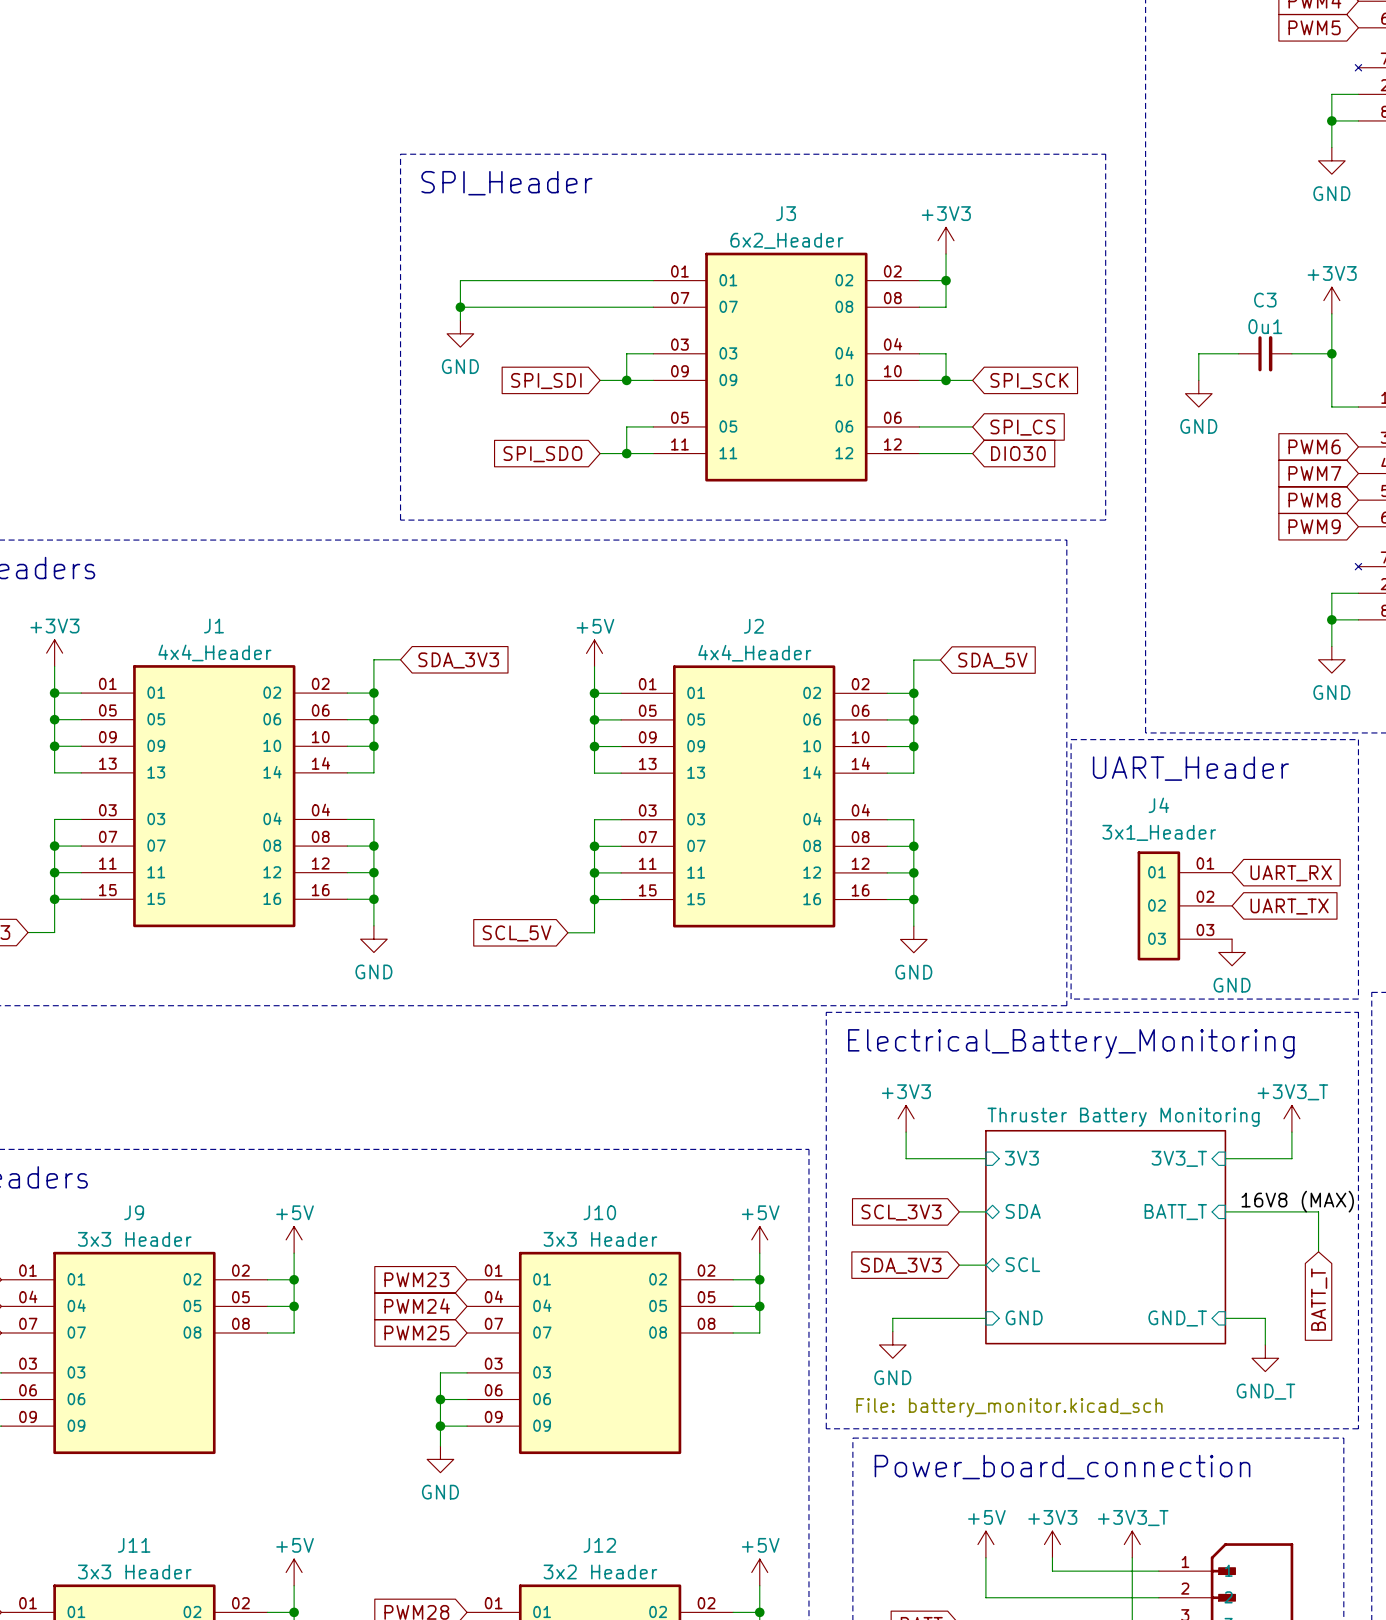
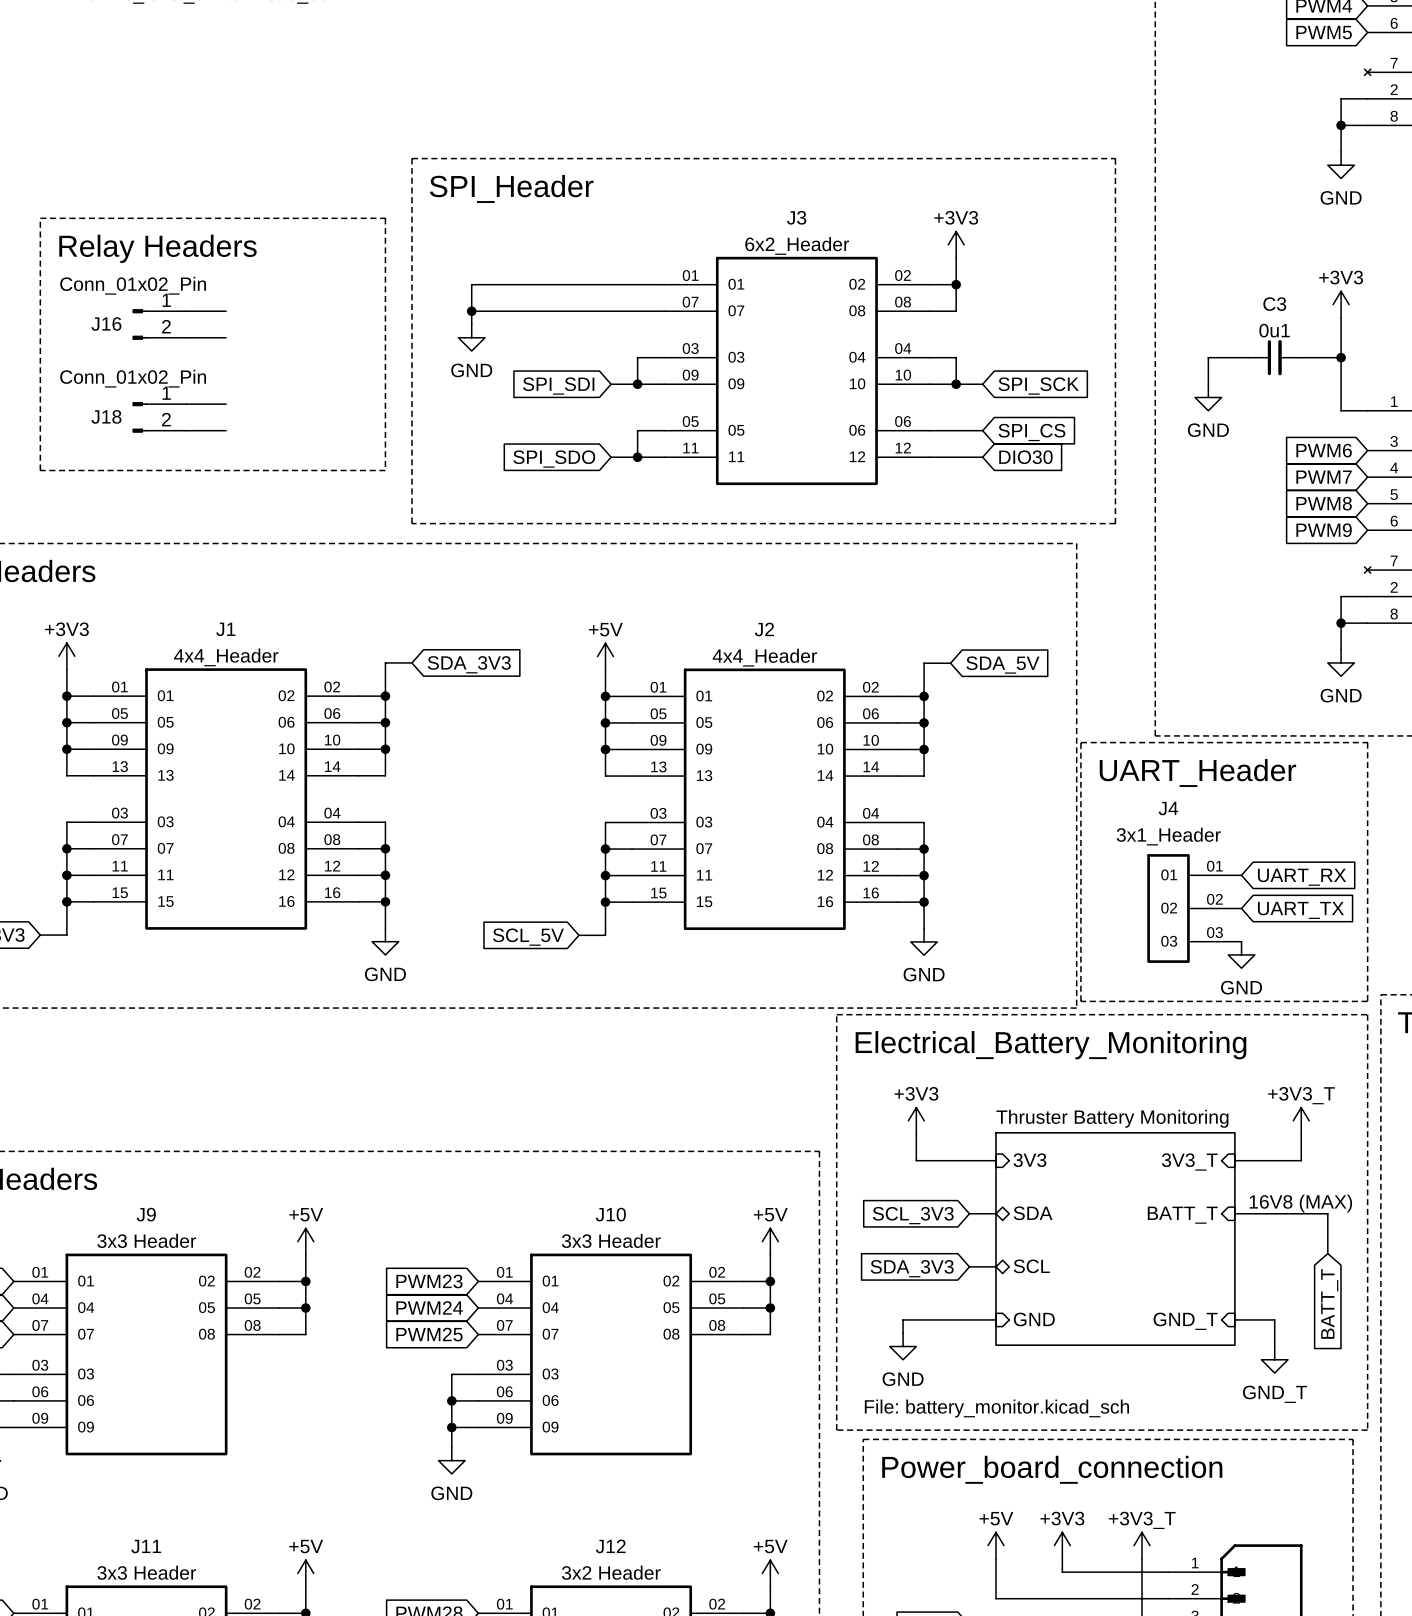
line: none -> (40, 218) (385, 218) (385, 470) (40, 470) (40, 218)
text: none -> Relay Headers (157, 248)
wire: none -> (186, 311) (226, 311)
J16: none -> Conn_01x02_Pin (159, 324)
wire: none -> (186, 337) (226, 337)
wire: none -> (186, 404) (226, 404)
J18: none -> Conn_01x02_Pin (159, 417)
wire: none -> (186, 430) (226, 430)

